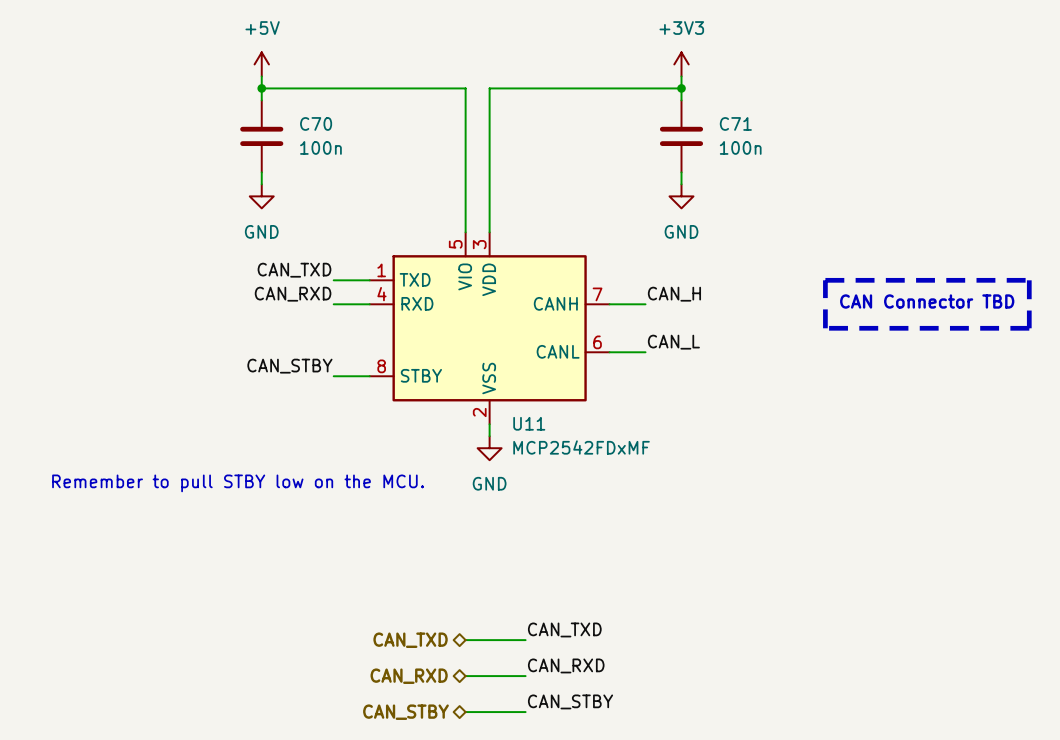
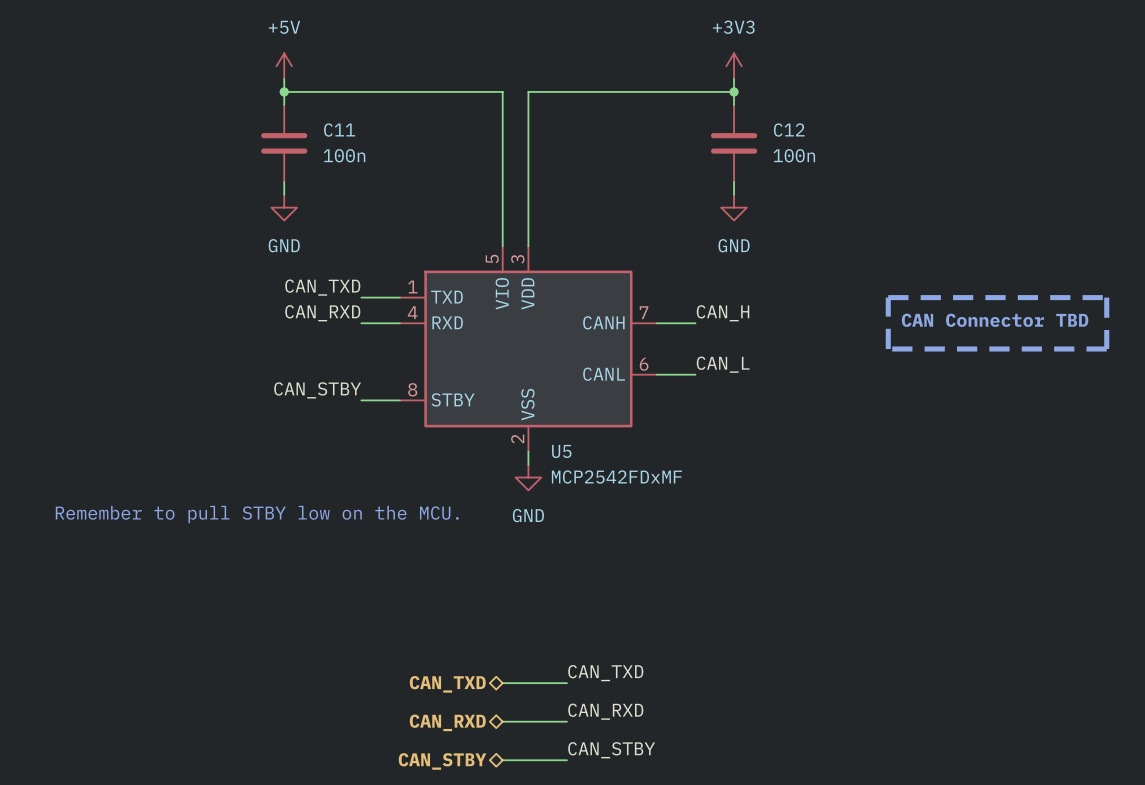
C70 name: C70 (316, 123) -> C11 (339, 130)
C71 name: C71 (735, 123) -> C12 (789, 130)
U11 name: U11 (529, 423) -> U5 (561, 451)

